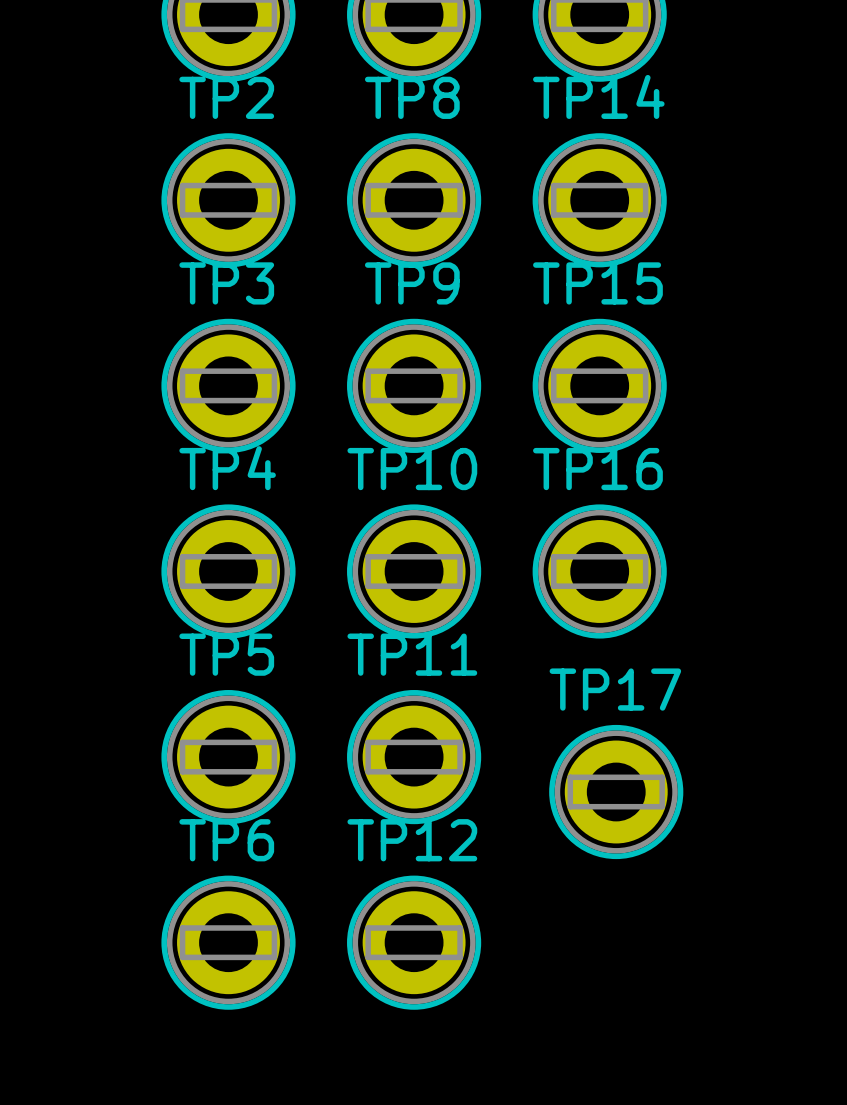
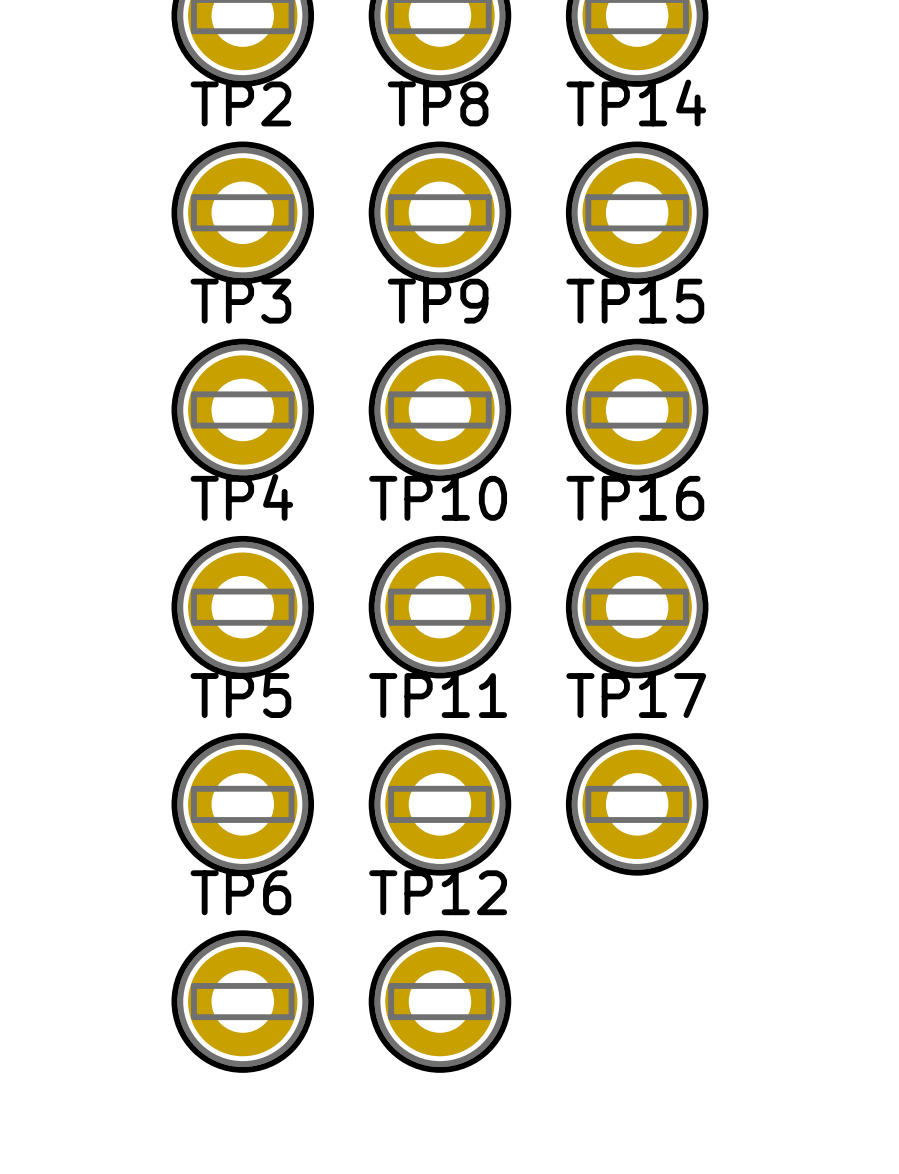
TP17 position: (616, 792) -> (637, 804)

